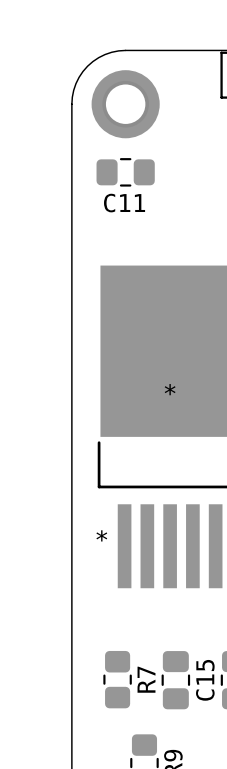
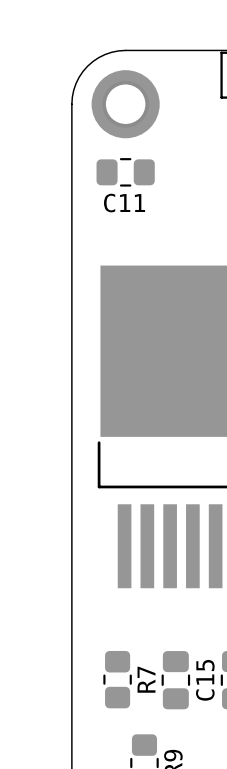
part text: * (170, 389) -> none
part text: * (101, 535) -> none

